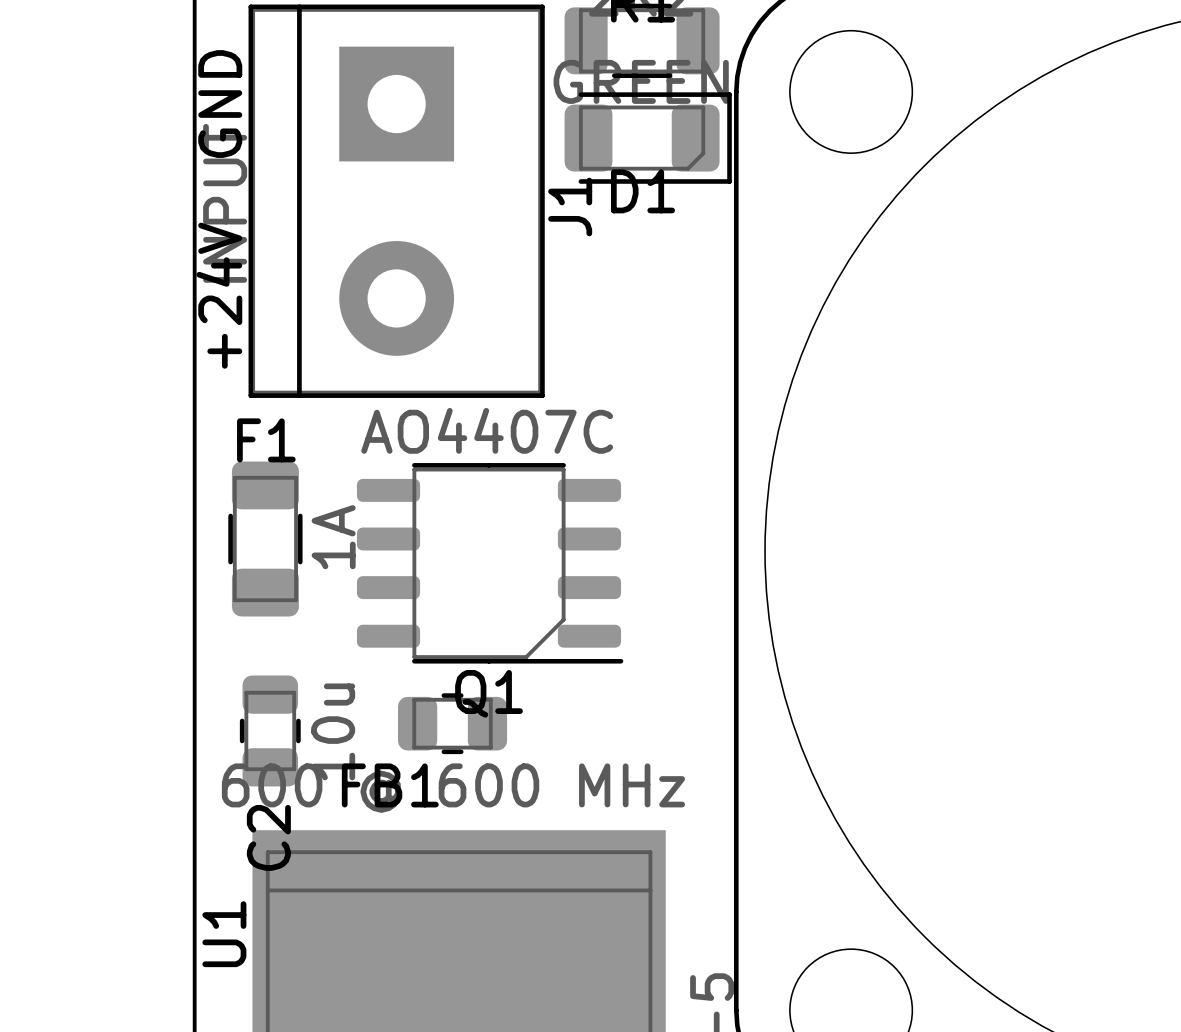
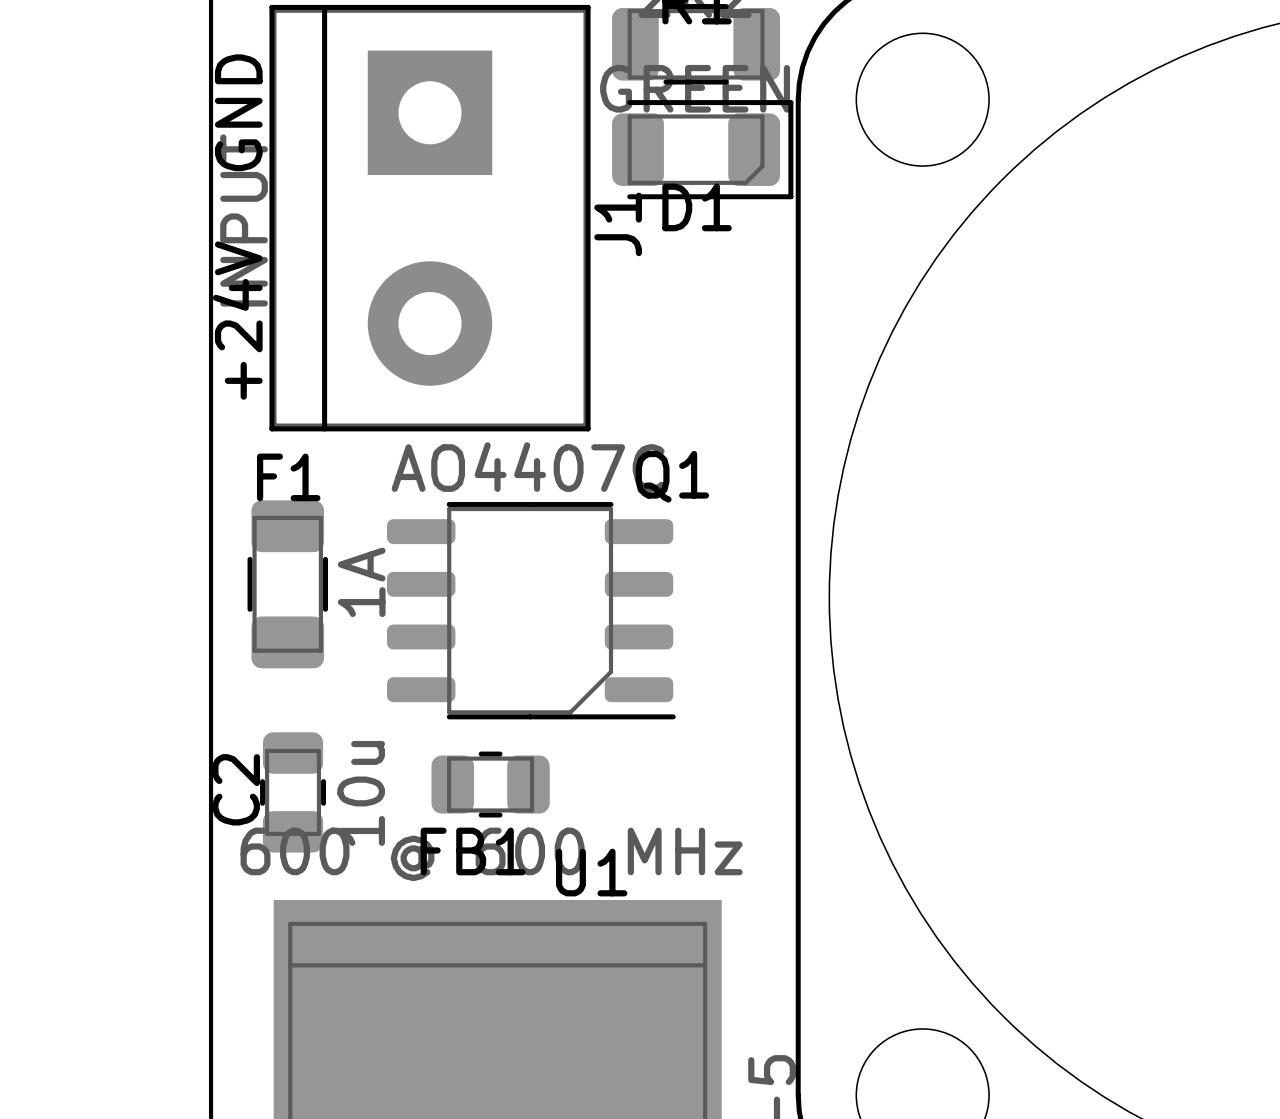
Q1 name position: Q1 (488, 693) -> Q1 (672, 476)
FB1 name position: FB1 (390, 785) -> FB1 (473, 851)
C2 name position: C2 (268, 837) -> C2 (236, 789)
U1 name rotation: 0° (224, 934) -> 90° clockwise (591, 872)
U1 name position: U1 (224, 934) -> U1 (591, 872)

